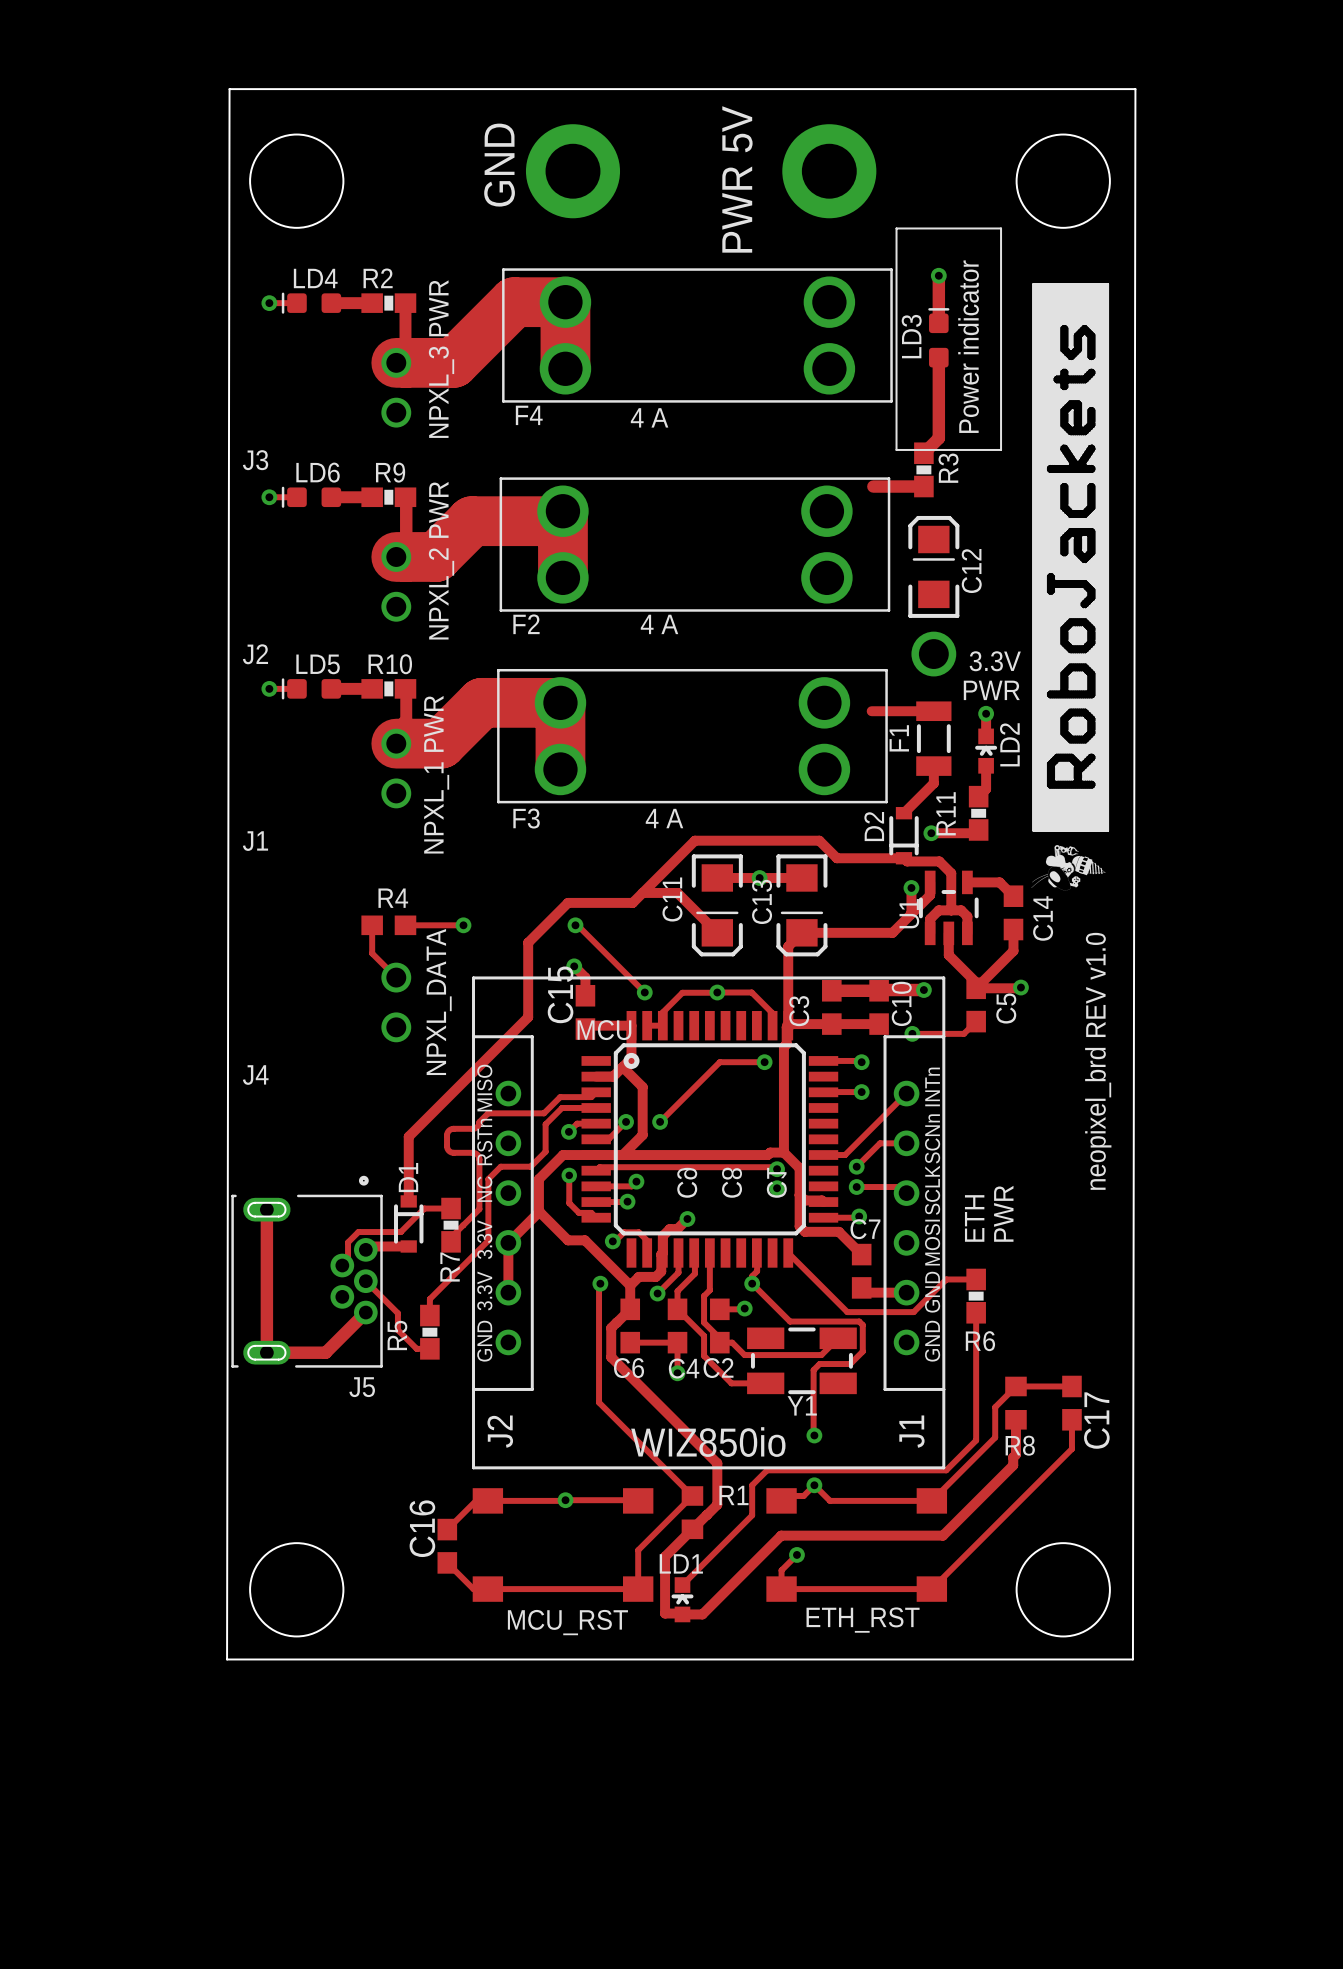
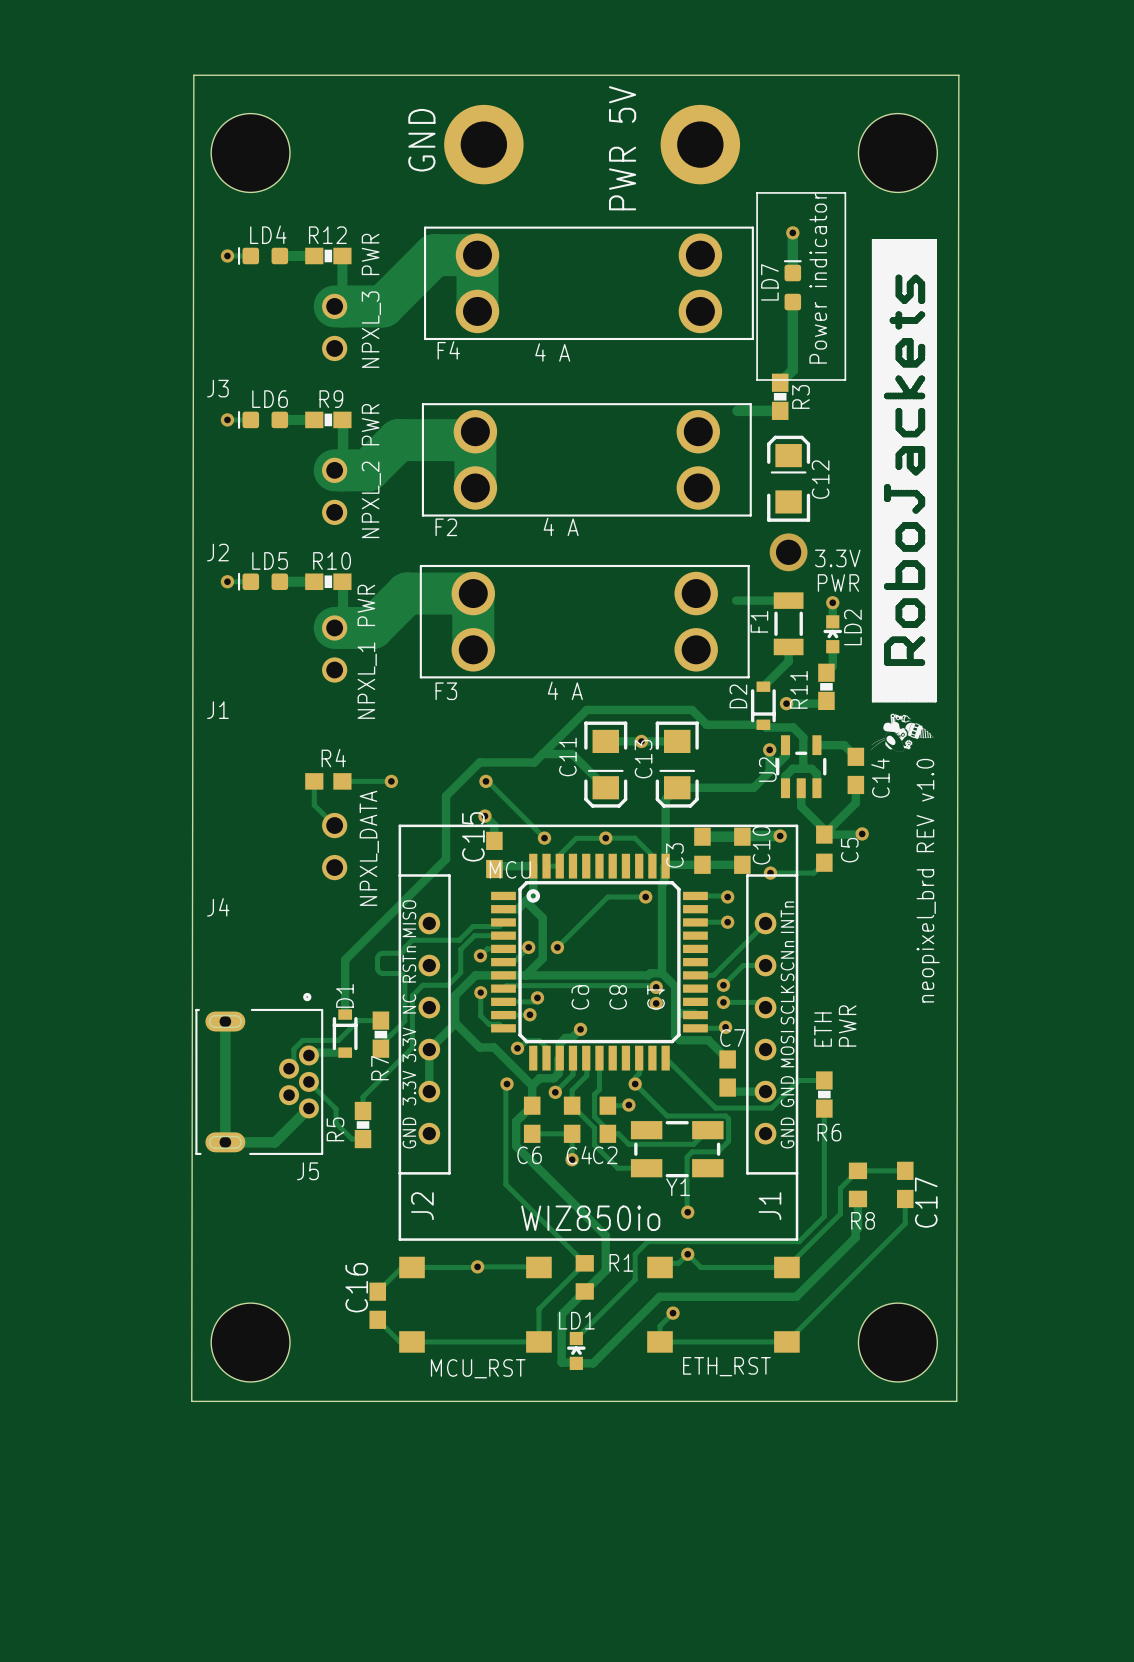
R2 name: R2 (378, 278) -> R12 (327, 235)
LD3 name: LD3 (911, 336) -> LD7 (769, 282)
U1 name: U1 (909, 913) -> U2 (767, 769)

